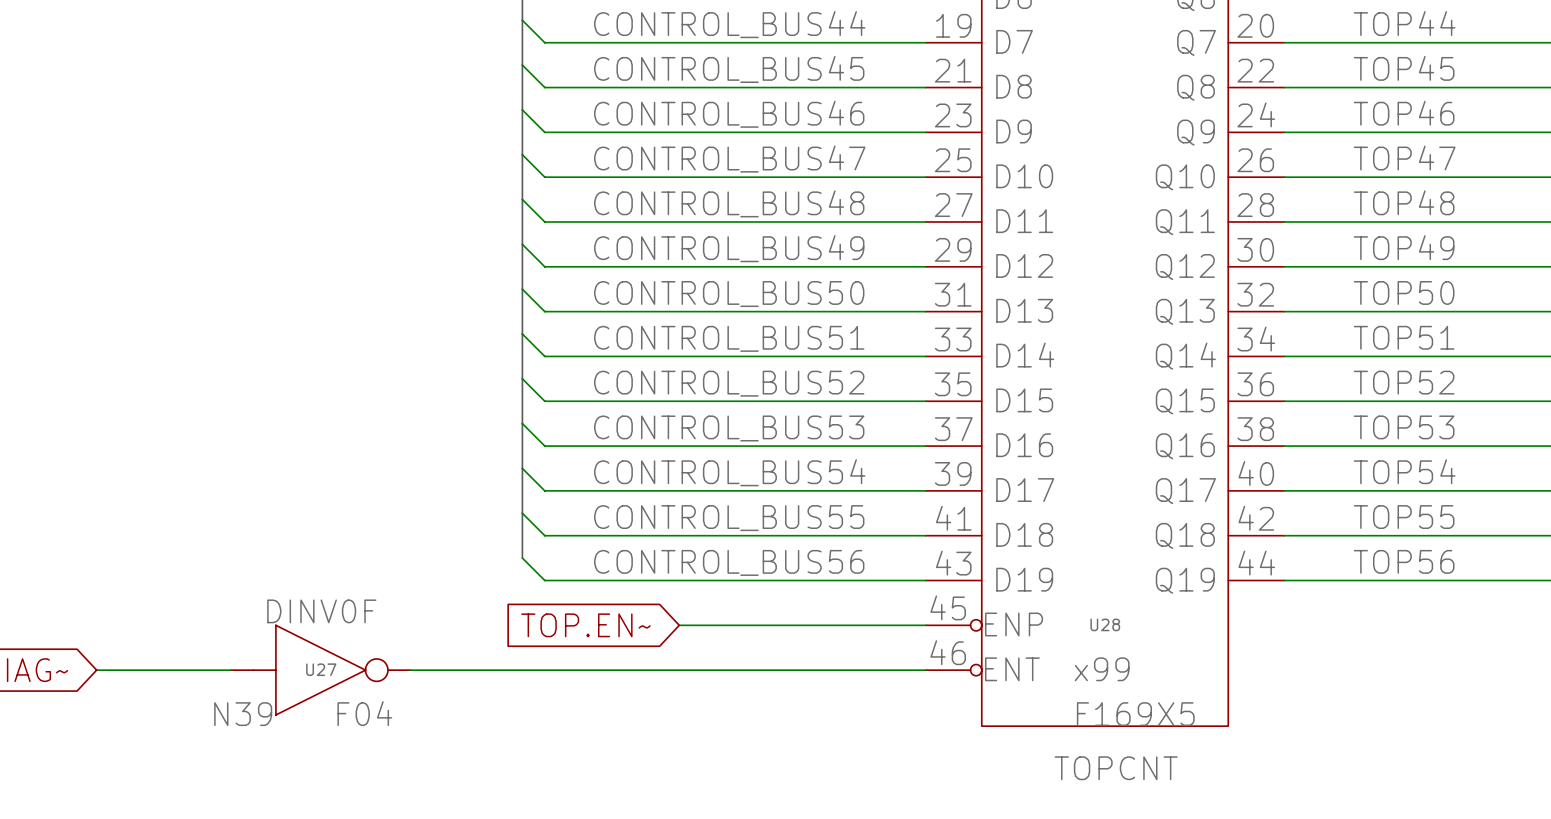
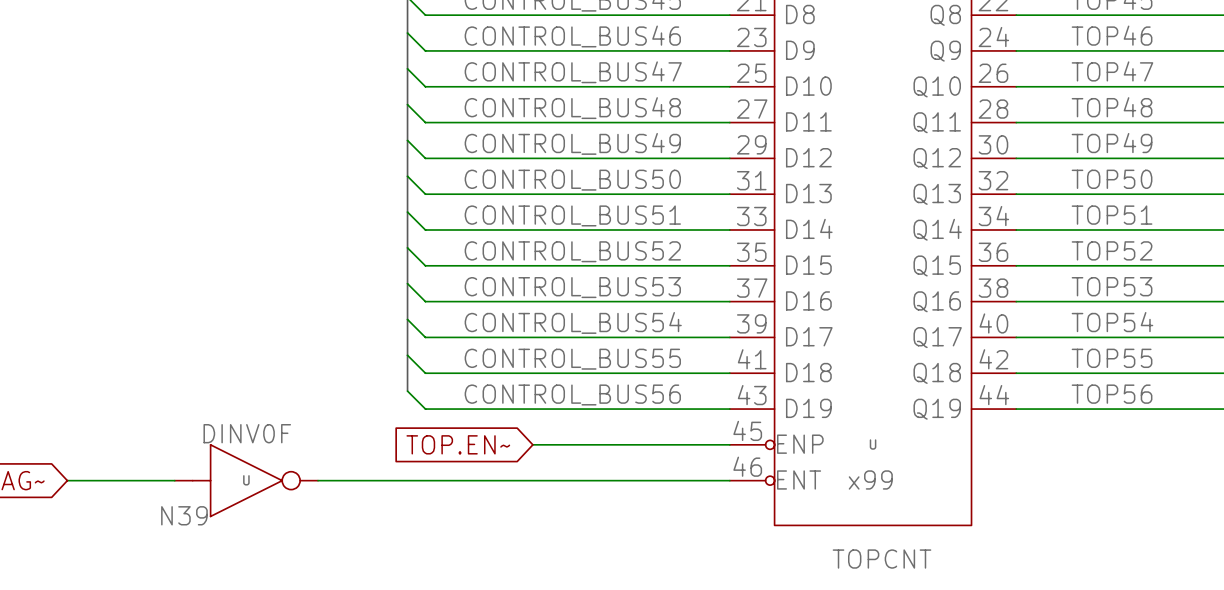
U28 name: U28 (1105, 624) -> U (873, 444)
U27 name: U27 (321, 669) -> U (246, 480)
U27 value: F04 (364, 713) -> none
U28 value: F169X5 (1135, 714) -> none

